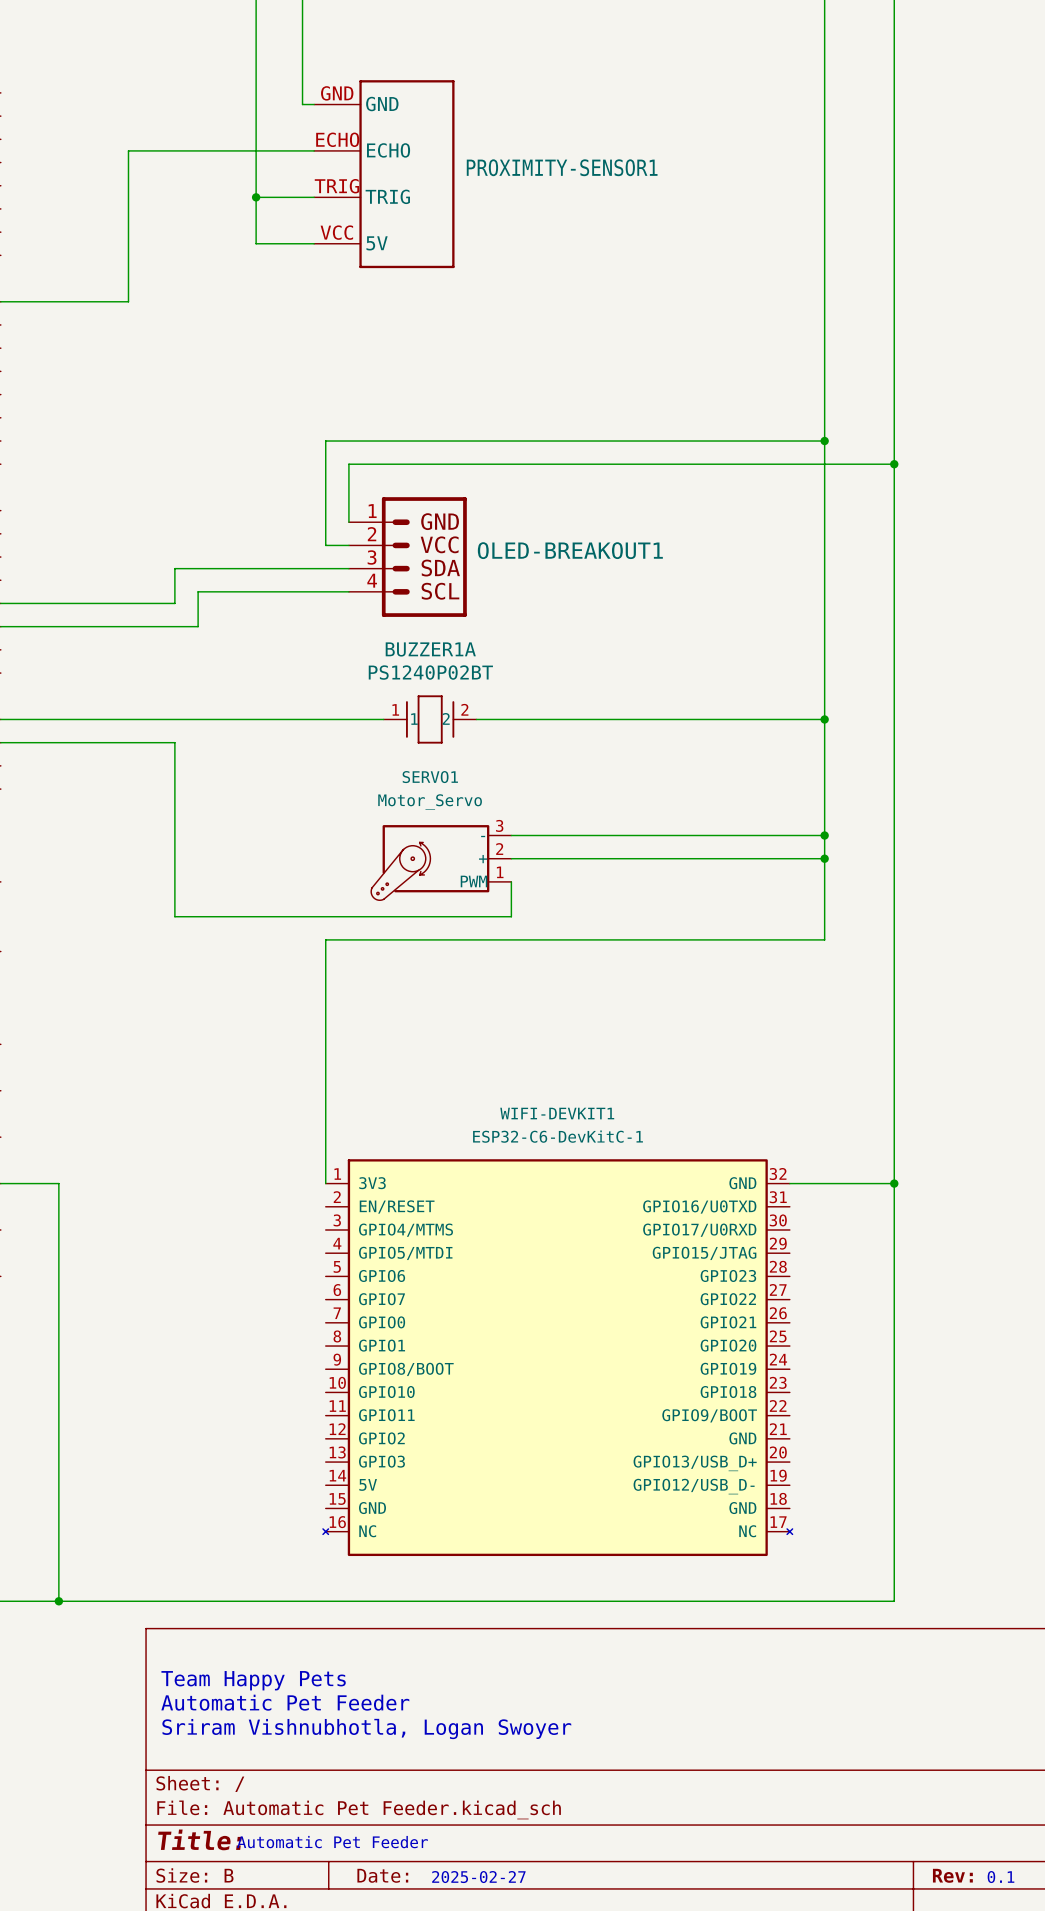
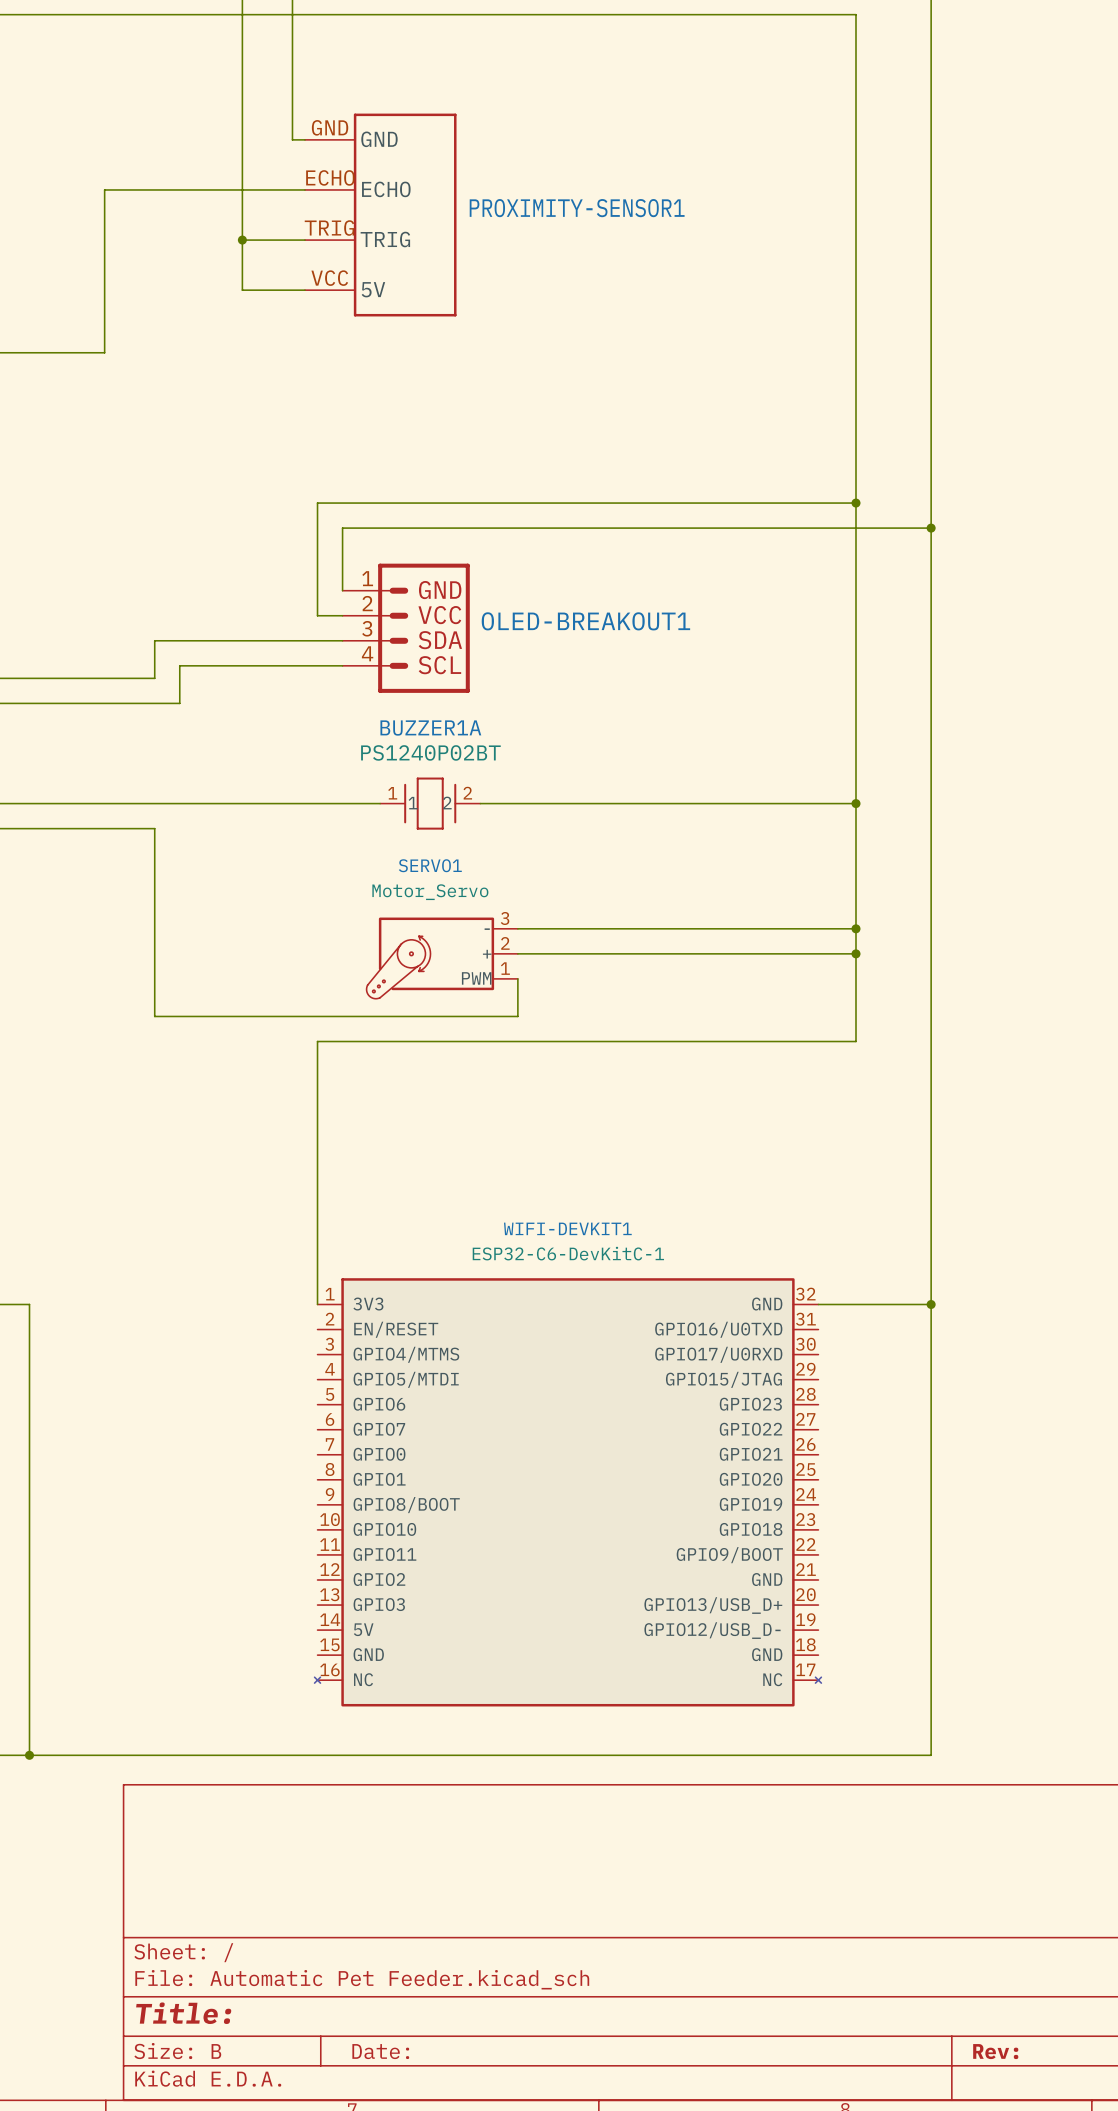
text: Team Happy Pets (253, 1680) -> none
text: Automatic Pet Feeder (285, 1702) -> none
text: Sriram Vishnubhotla, Logan Swoyer (366, 1728) -> none
text: Automatic Pet Feeder (332, 1842) -> none
text: 2025-02-27 (478, 1877) -> none
text: 0.1 (1000, 1877) -> none

